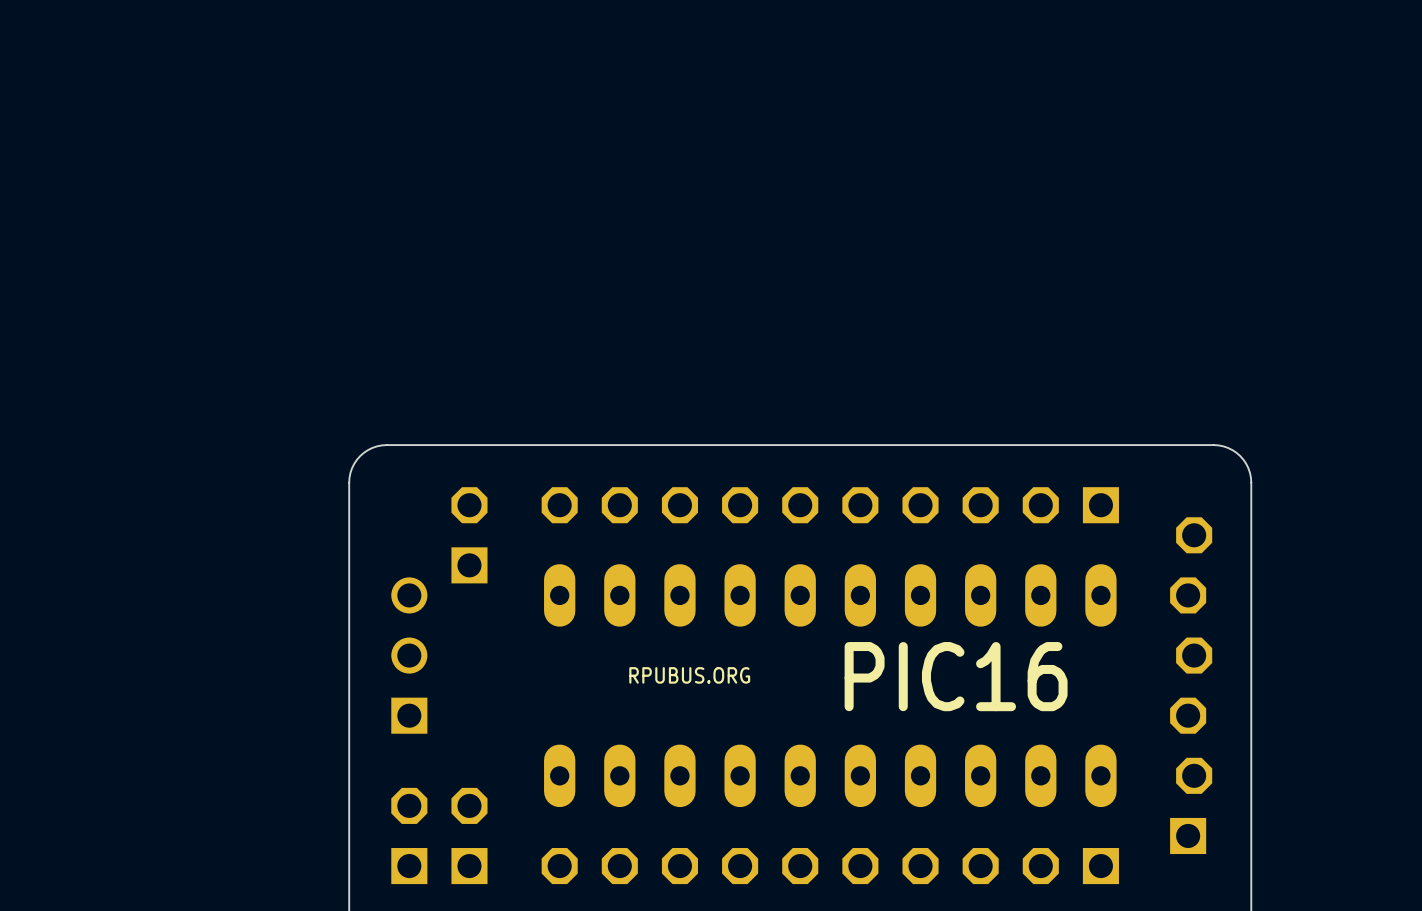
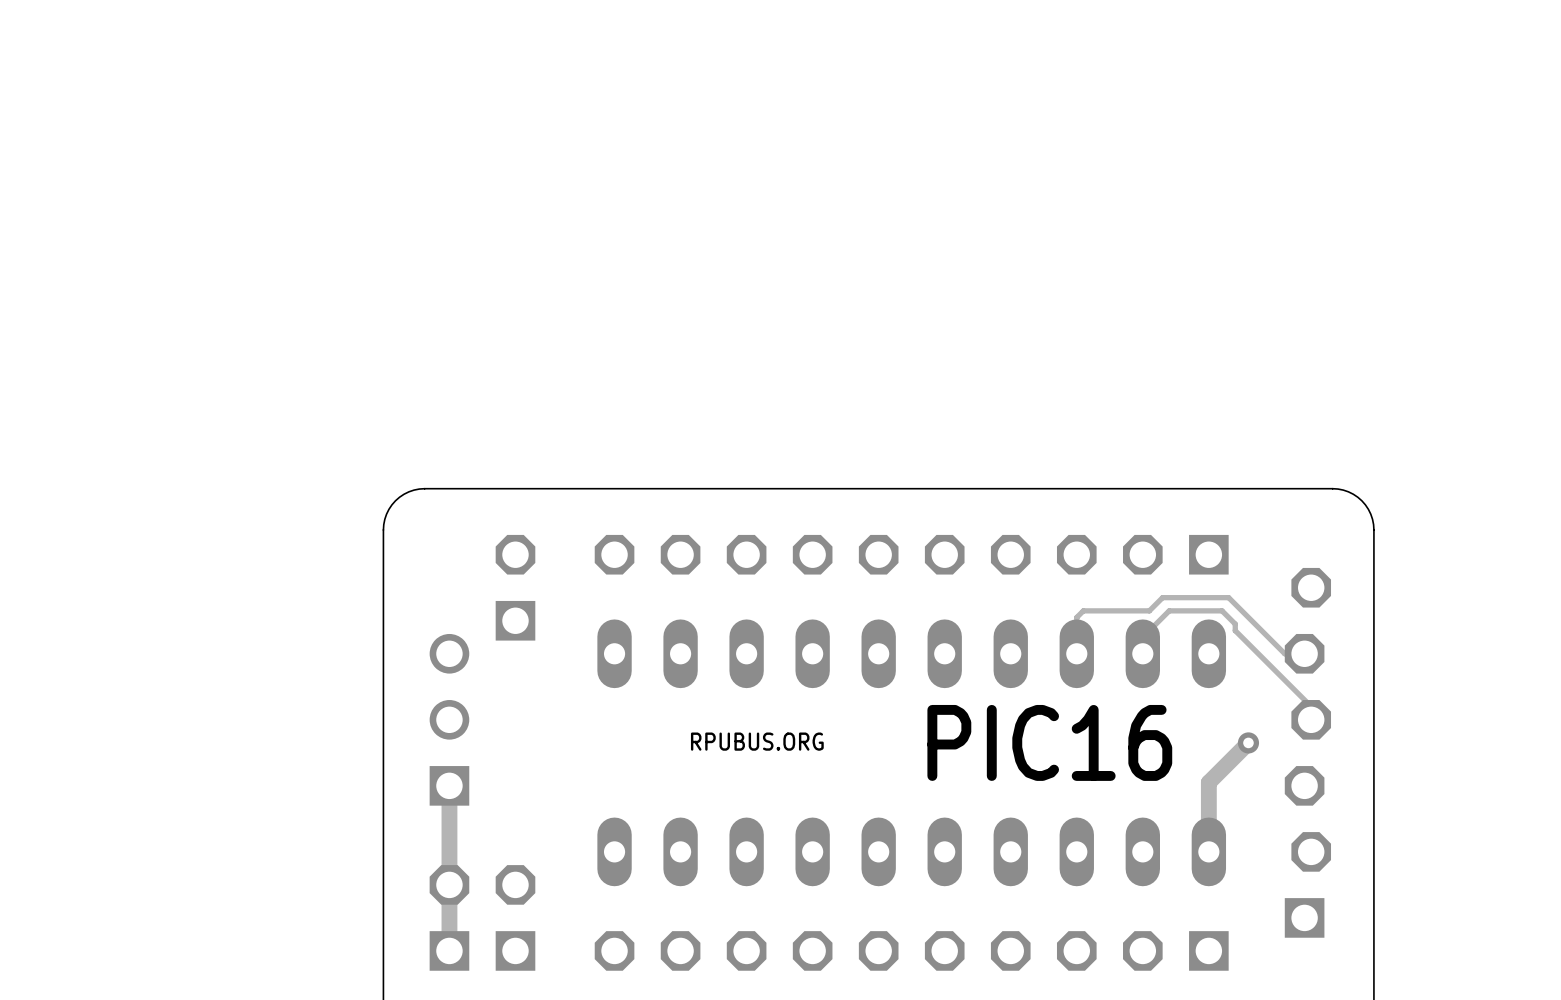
track: none -> (1142, 653) (1142, 637) (1169, 610) (1222, 610) (1235, 624) (1235, 630) (1311, 706) (1311, 719)
track: none -> (1304, 653) (1284, 653) (1228, 597) (1162, 597) (1149, 610) (1083, 610) (1076, 617) (1076, 653)
track: none -> (1248, 742) (1208, 782) (1208, 851)
via: none -> (1248, 742)
track: none -> (449, 785) (449, 950)

